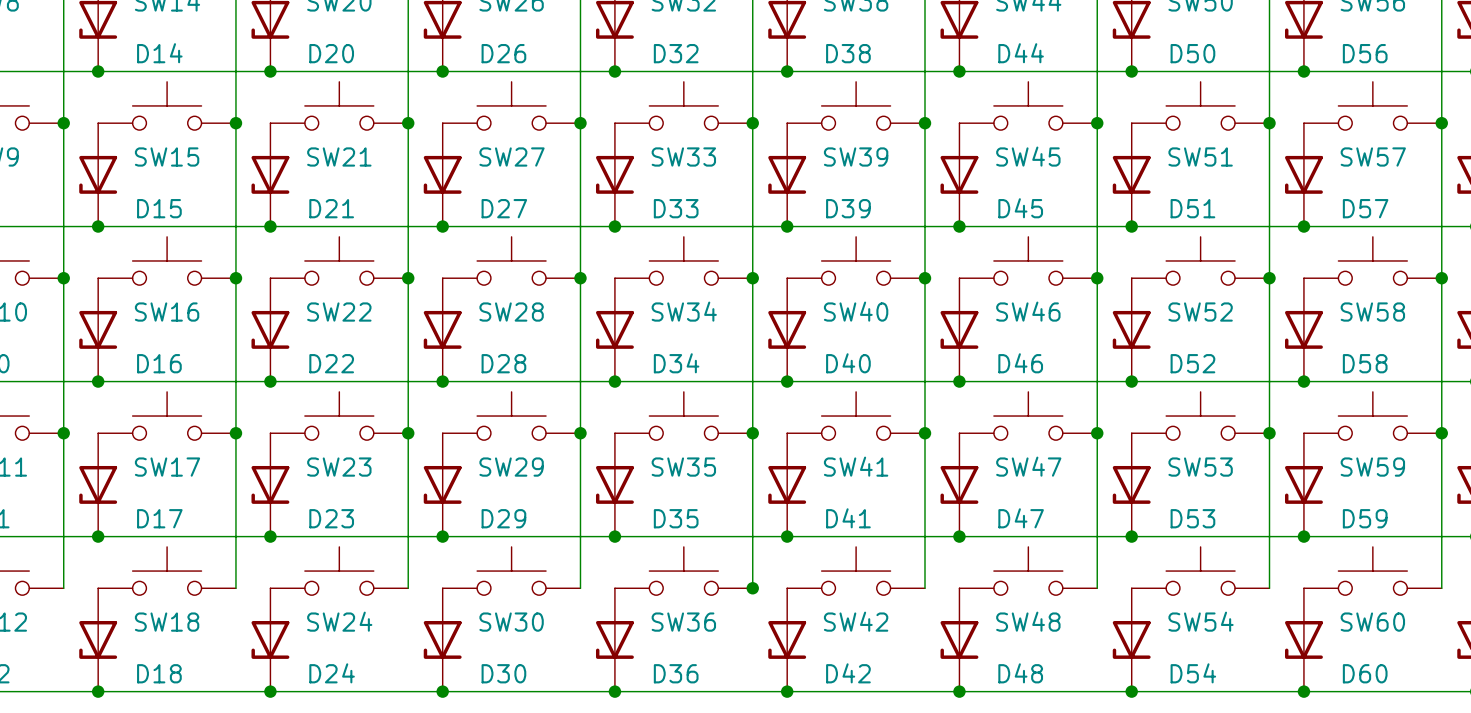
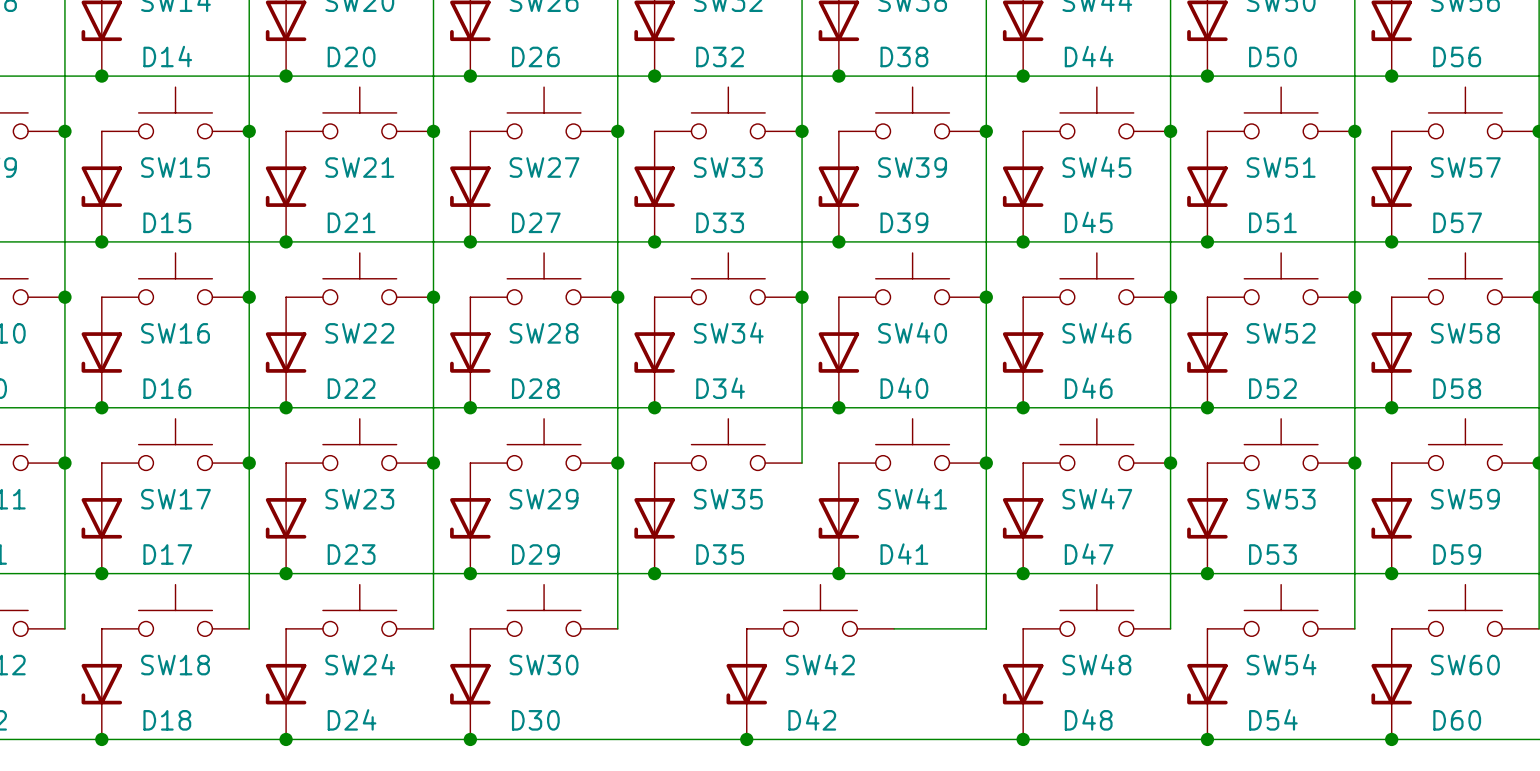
wire: (752, 433) (752, 591) -> none
junction: (752, 433) -> none
SW36: (683, 571) -> none
SW42 position: (856, 571) -> (820, 610)
junction: (752, 588) -> none
wire: none -> (894, 628) (986, 628)
D36: (614, 639) -> none
D42 position: (787, 639) -> (746, 684)
junction: (614, 691) -> none
junction: none -> (746, 739)
junction: (787, 691) -> none

